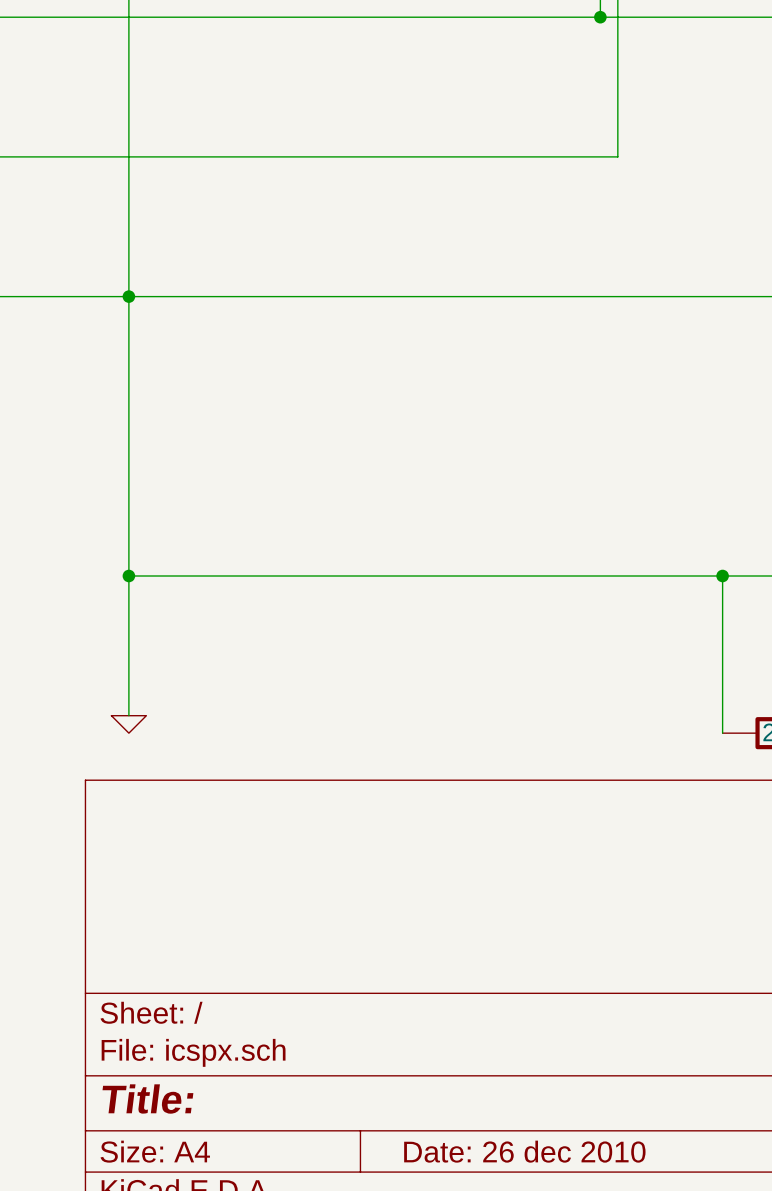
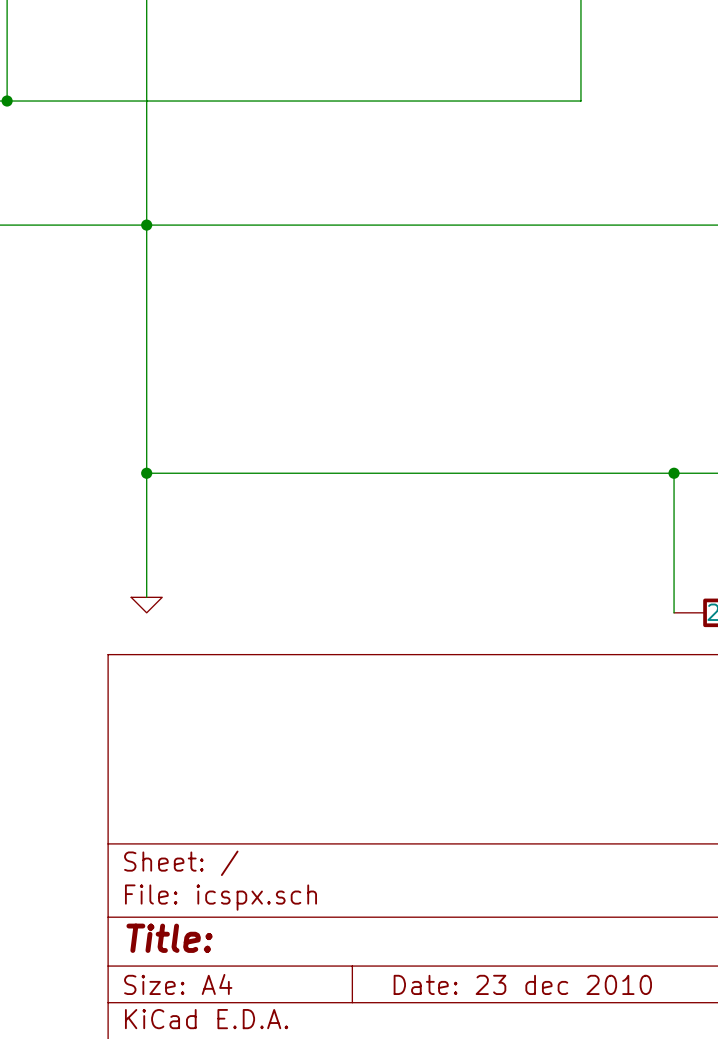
title block: Date: 26 dec 2010 (524, 1151) -> Date: 23 dec 2010 (522, 984)

